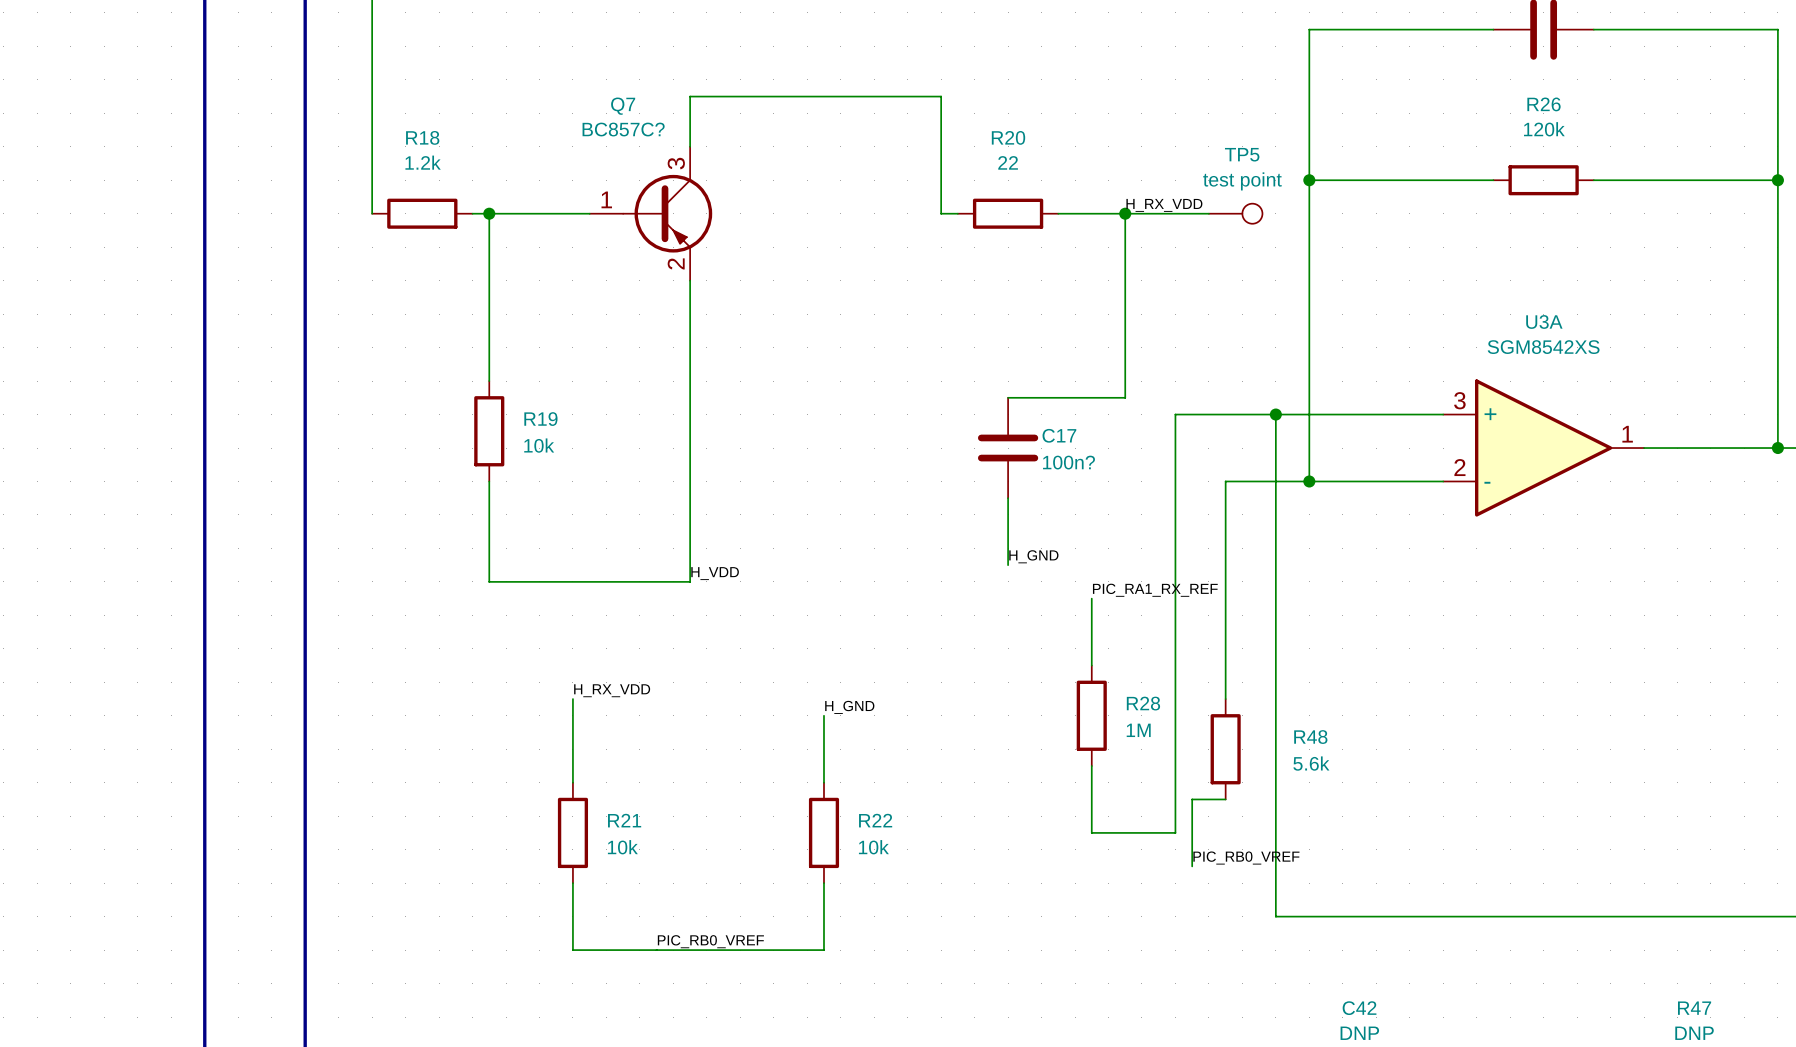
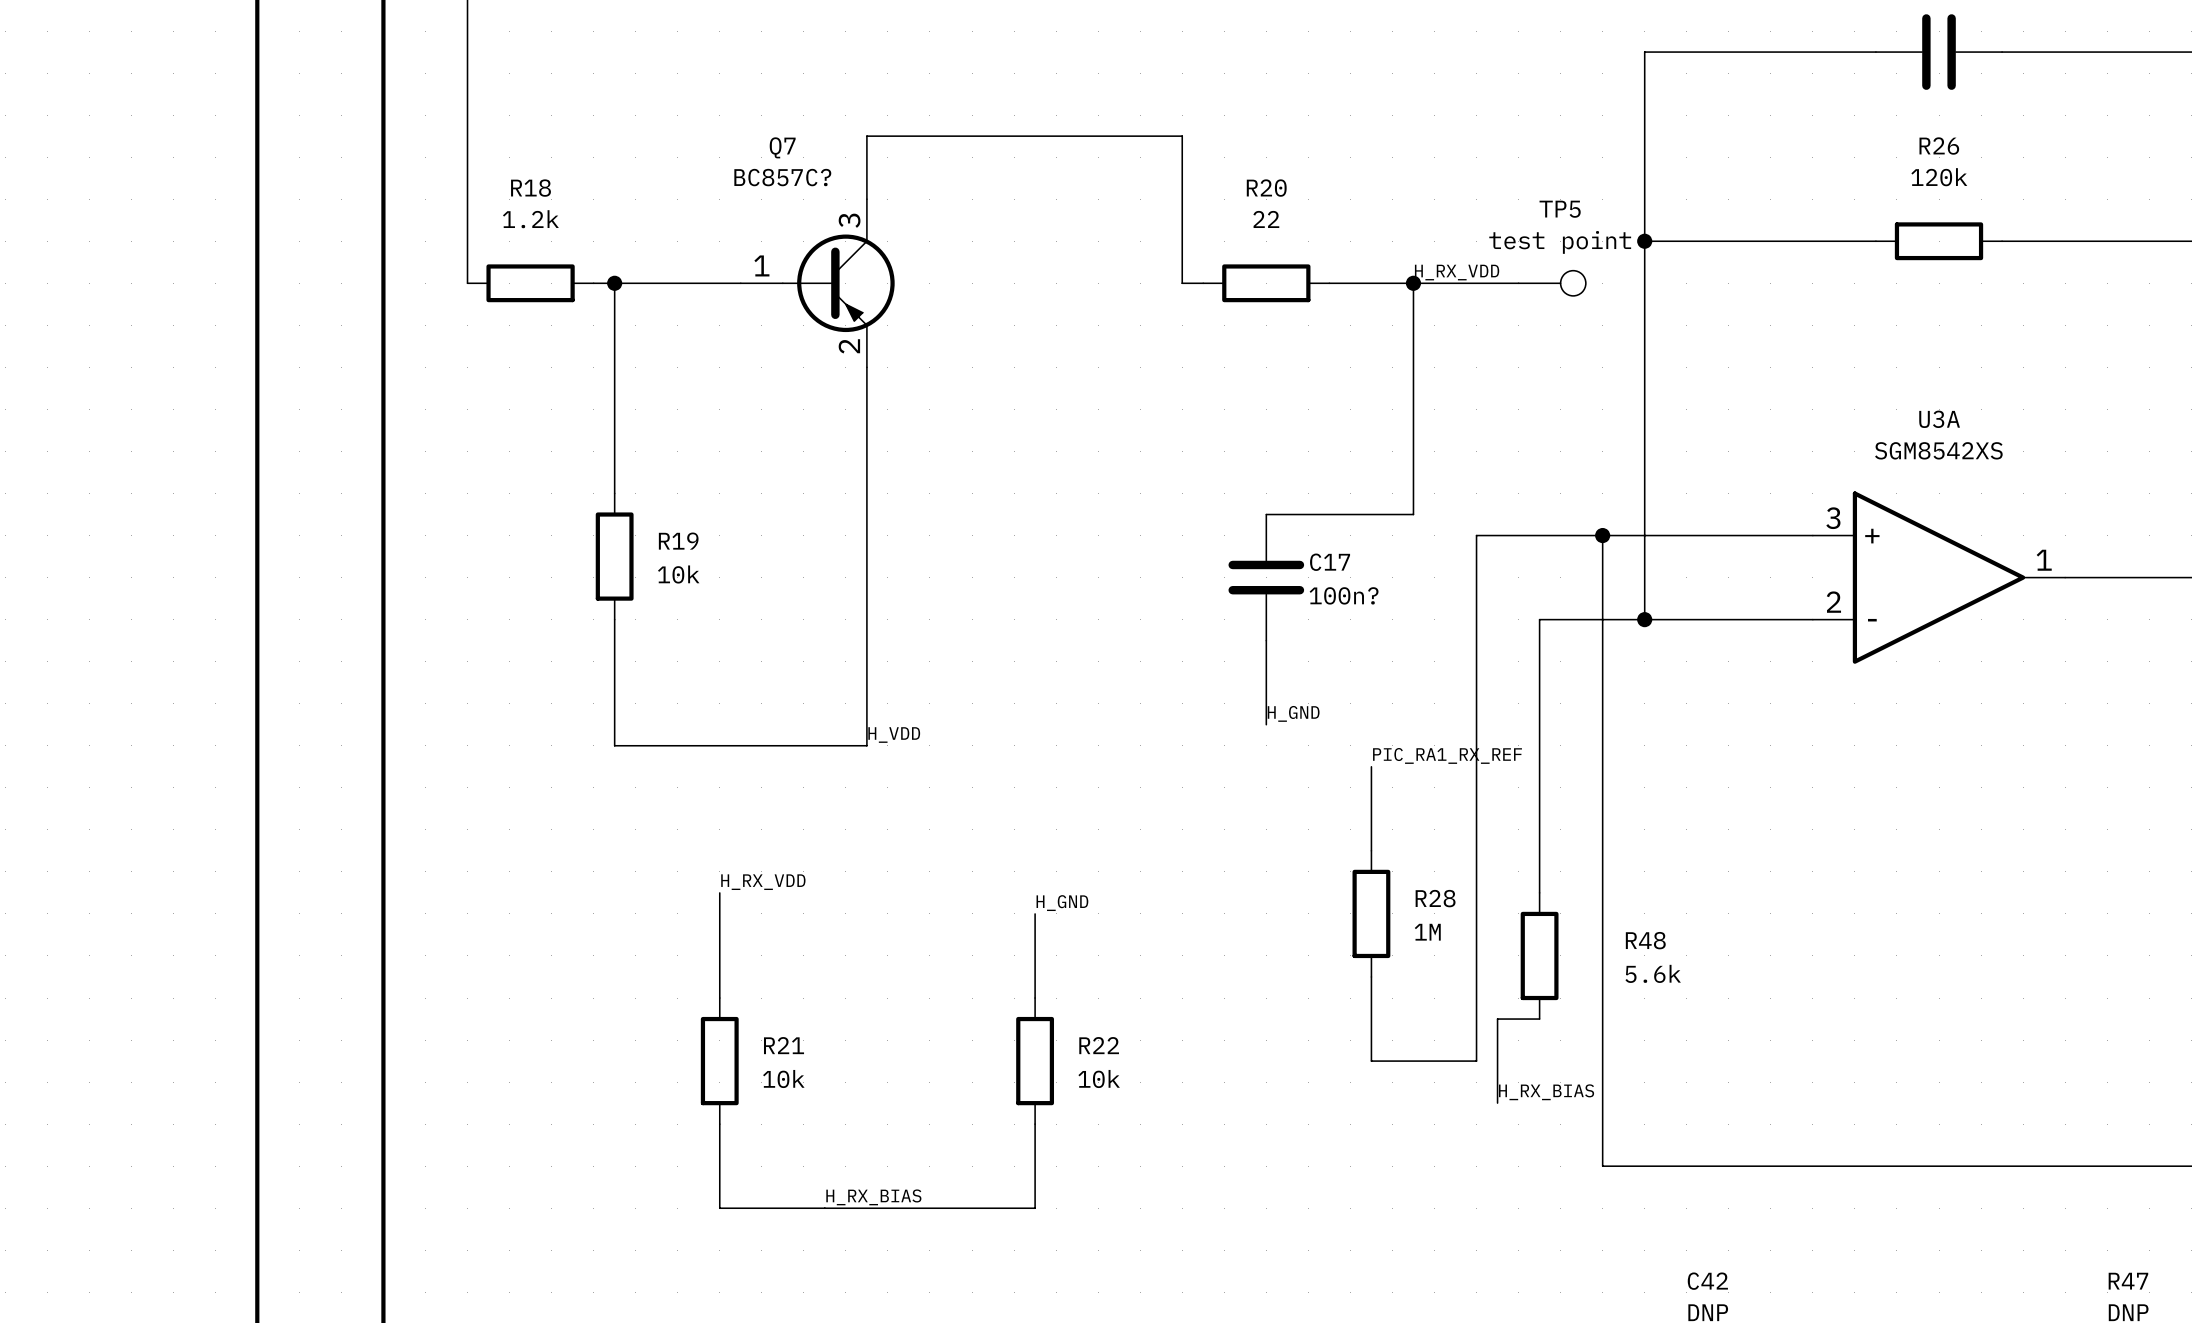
label: PIC_RB0_VREF (1246, 858) -> H_RX_BIAS (1546, 1092)
label: PIC_RB0_VREF (710, 941) -> H_RX_BIAS (873, 1197)

